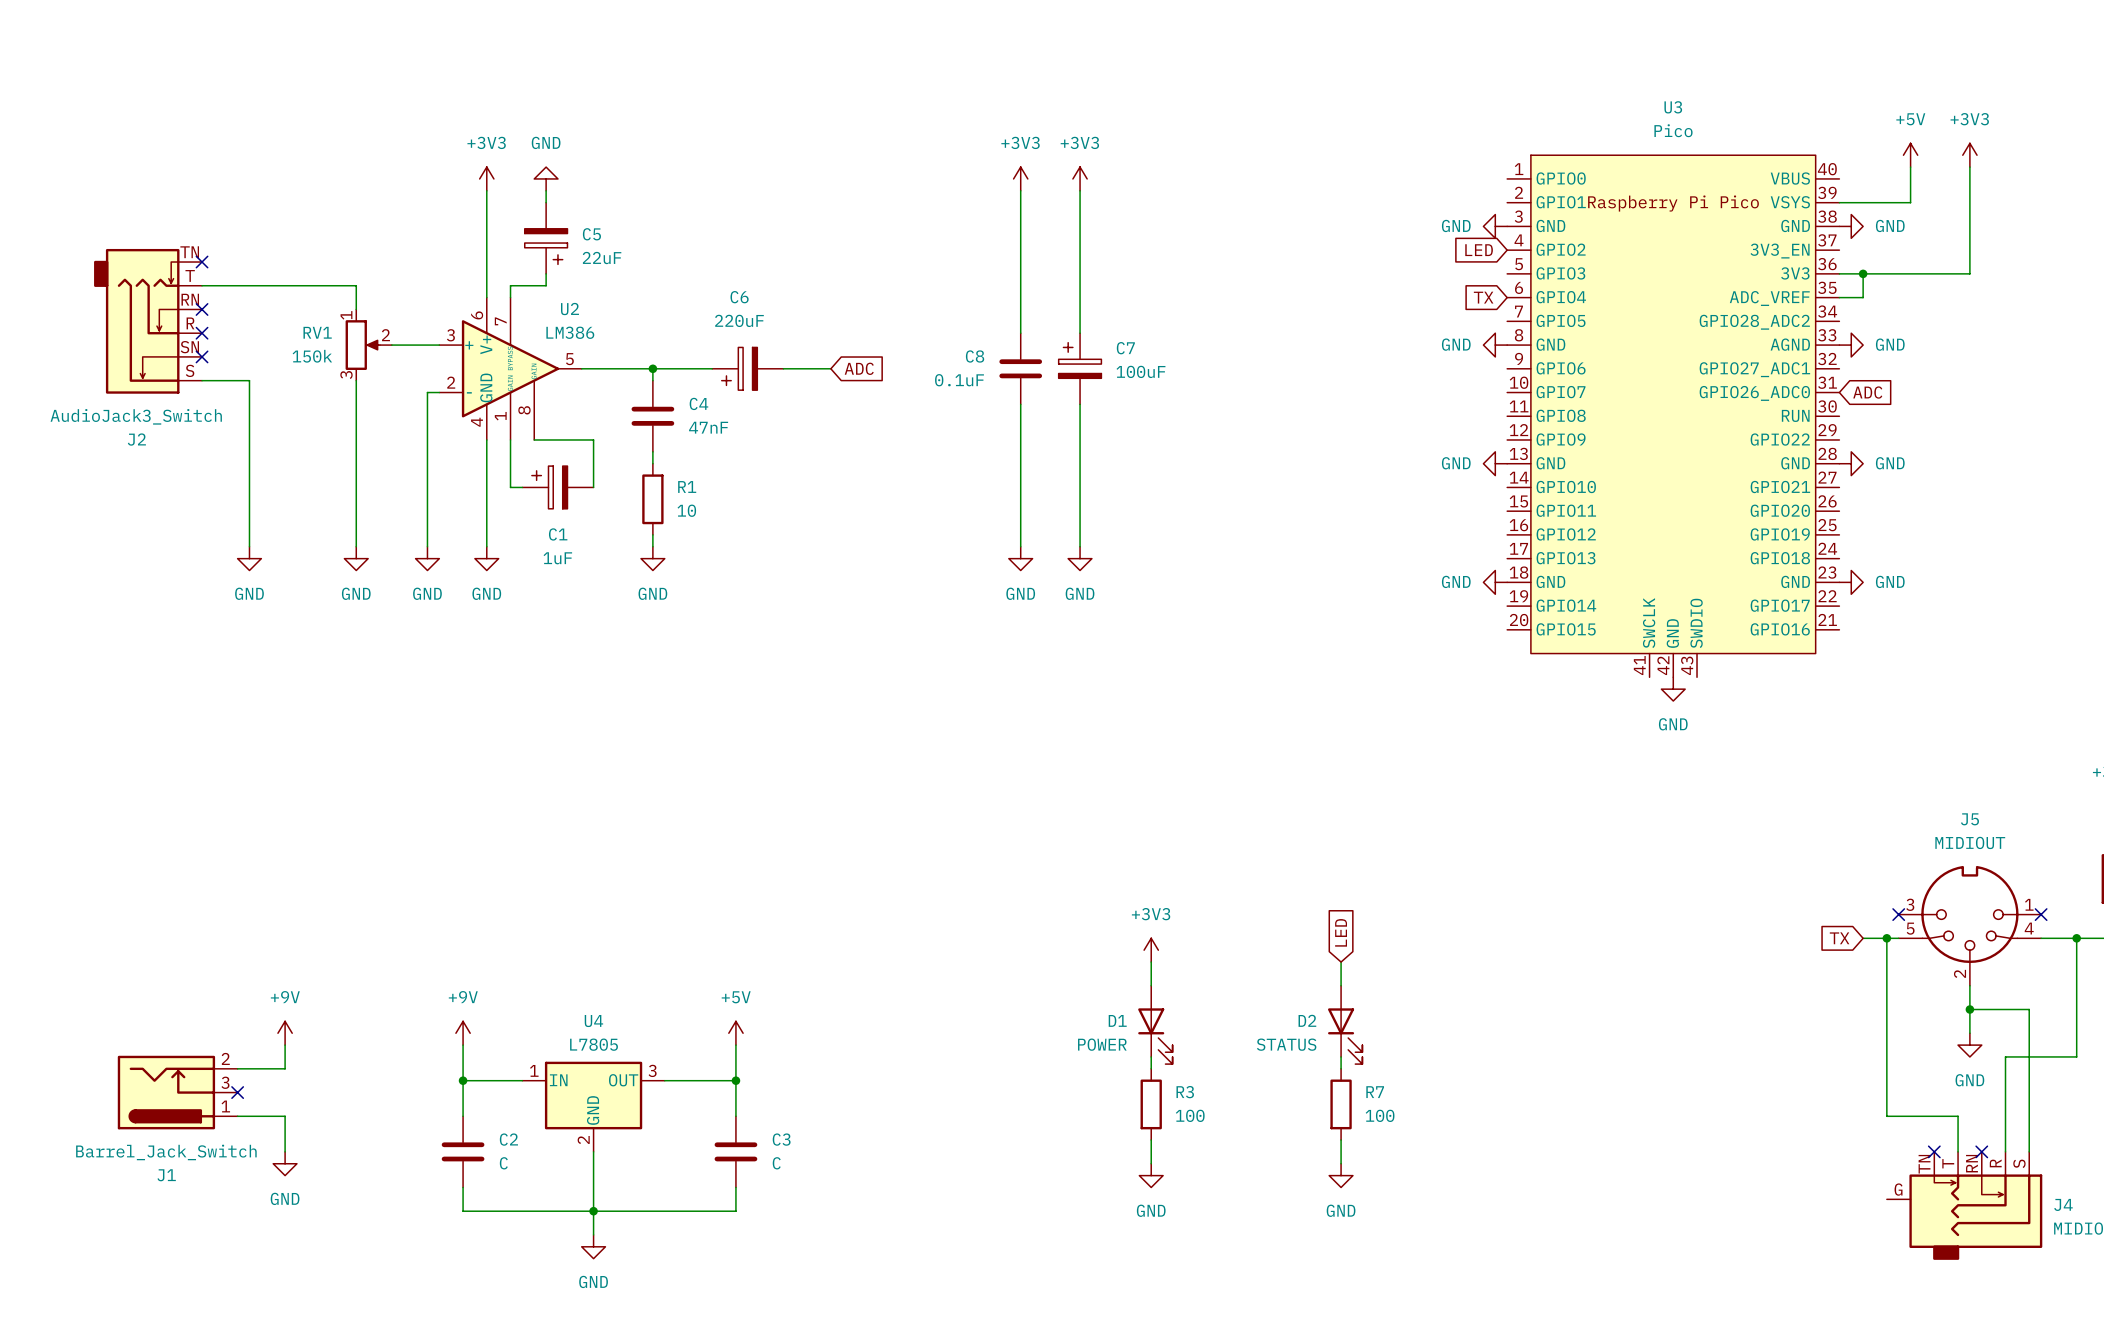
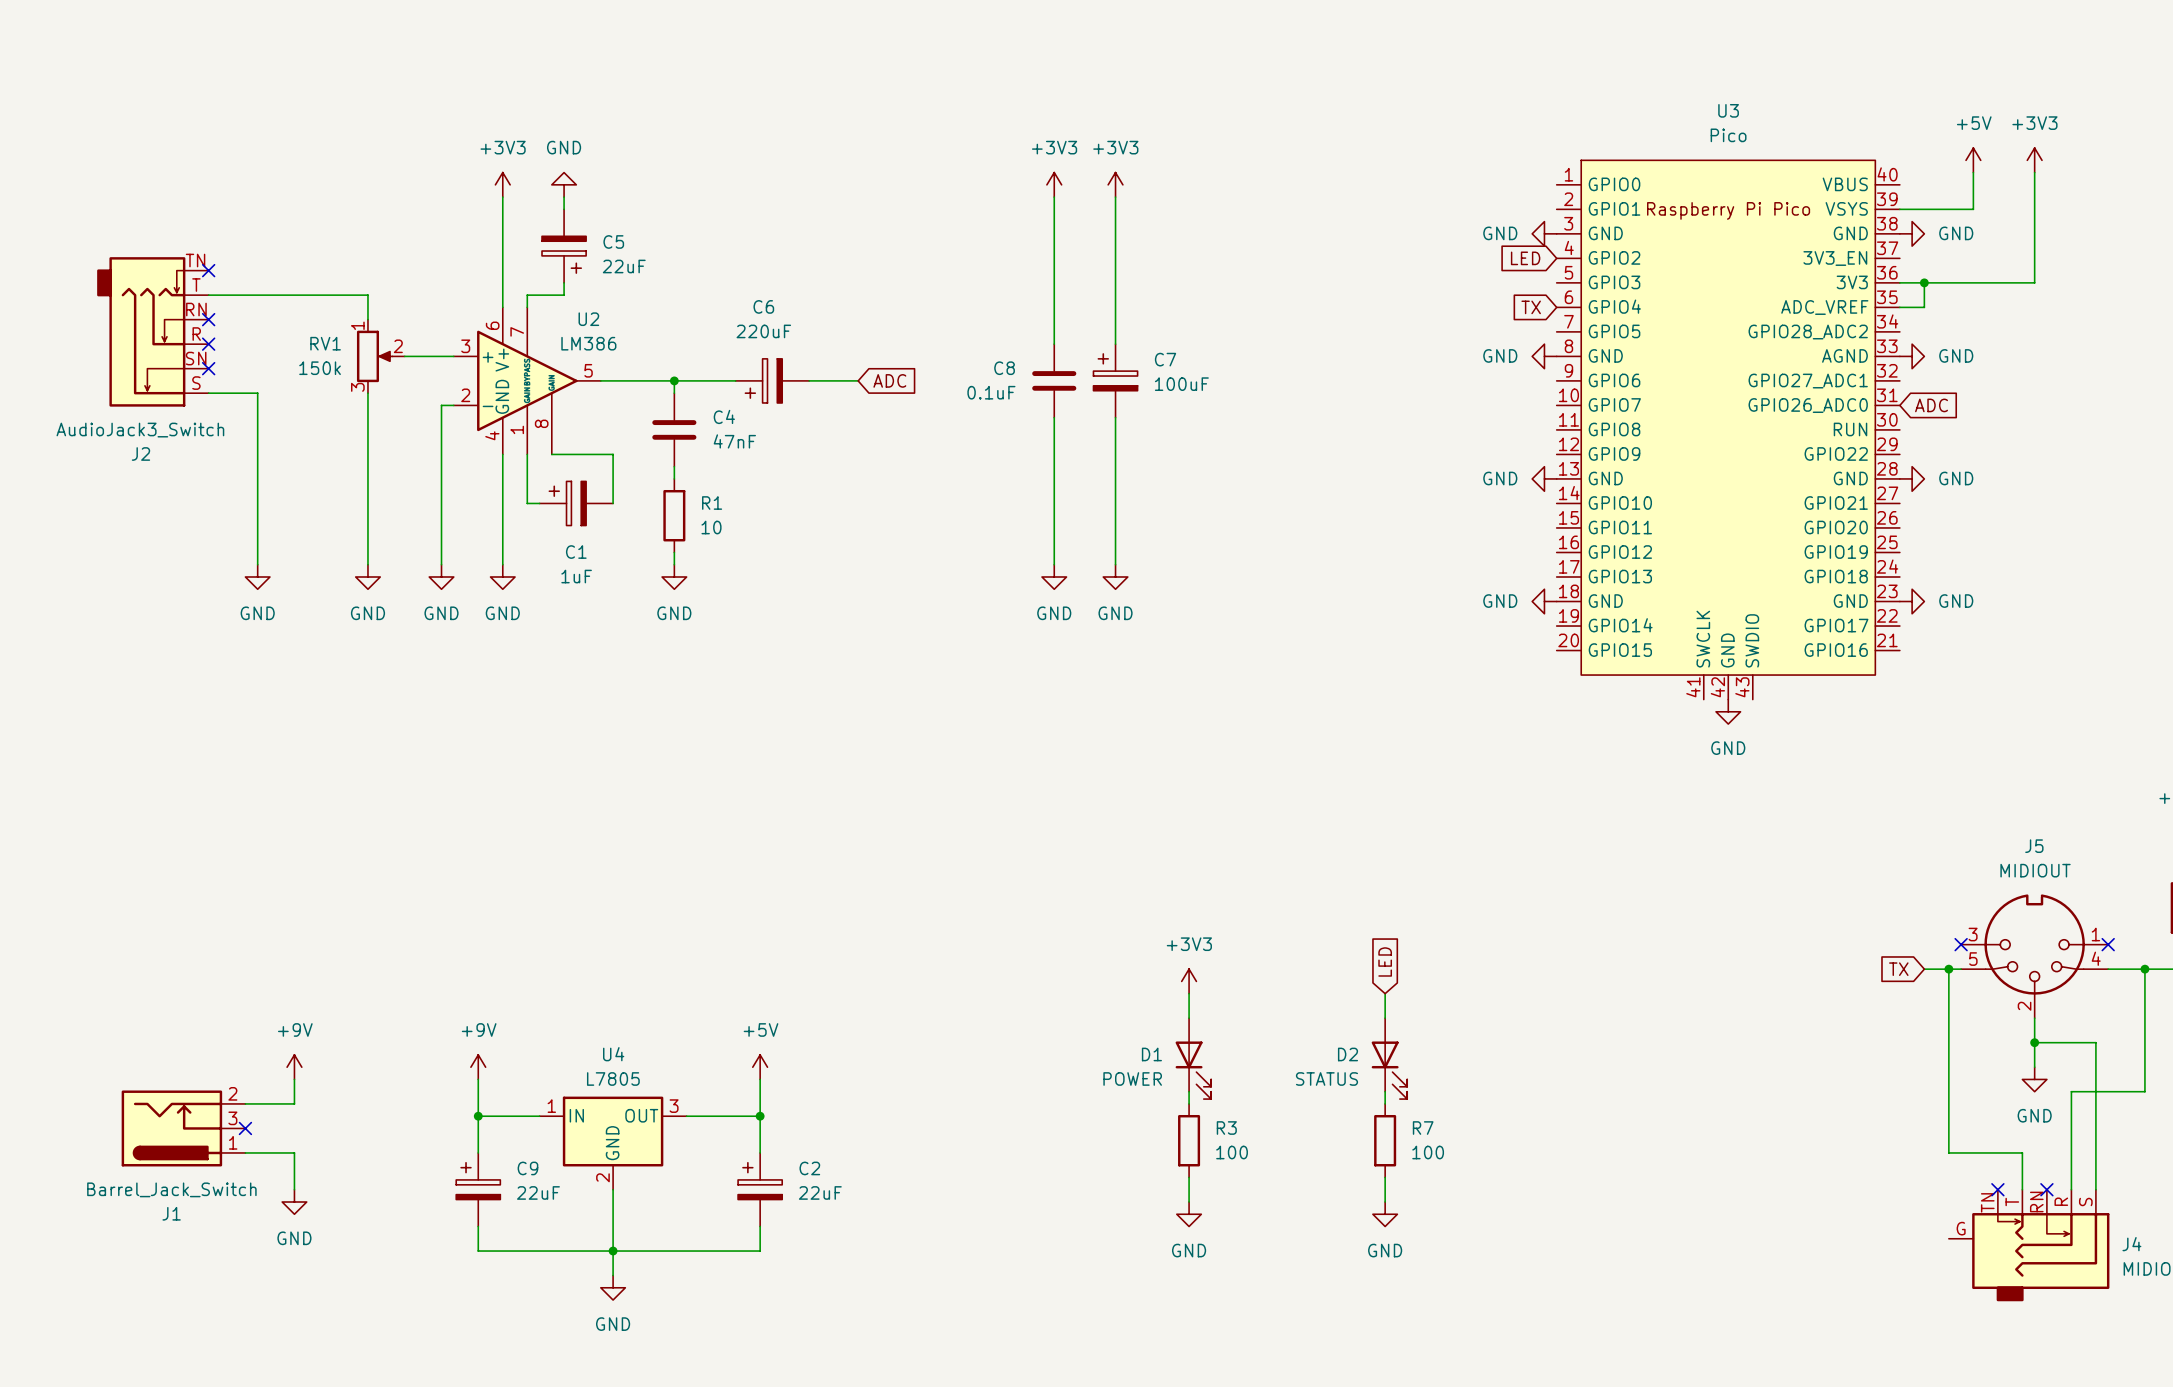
C2 symbol: [441, 1116, 485, 1188] -> [738, 1152, 783, 1227]
C9: none -> 22uF (478, 1189)
C3: C (735, 1151) -> none
C2 value: C (503, 1163) -> 22uF (820, 1192)

